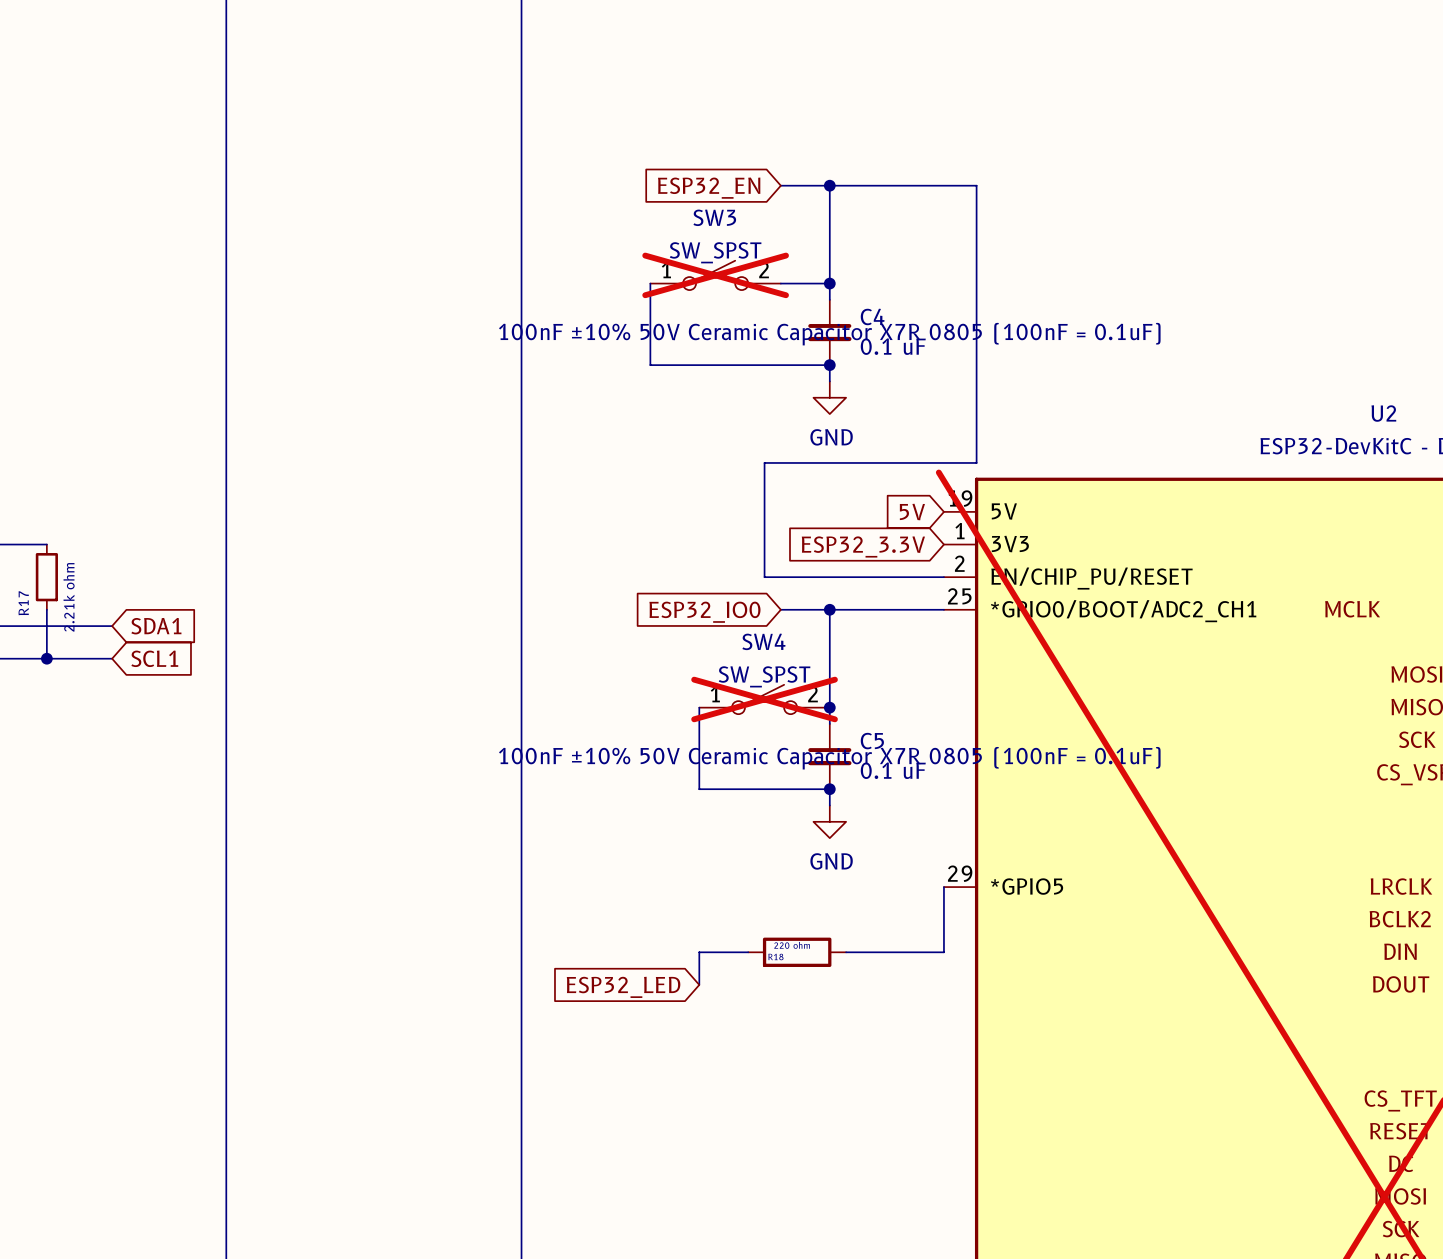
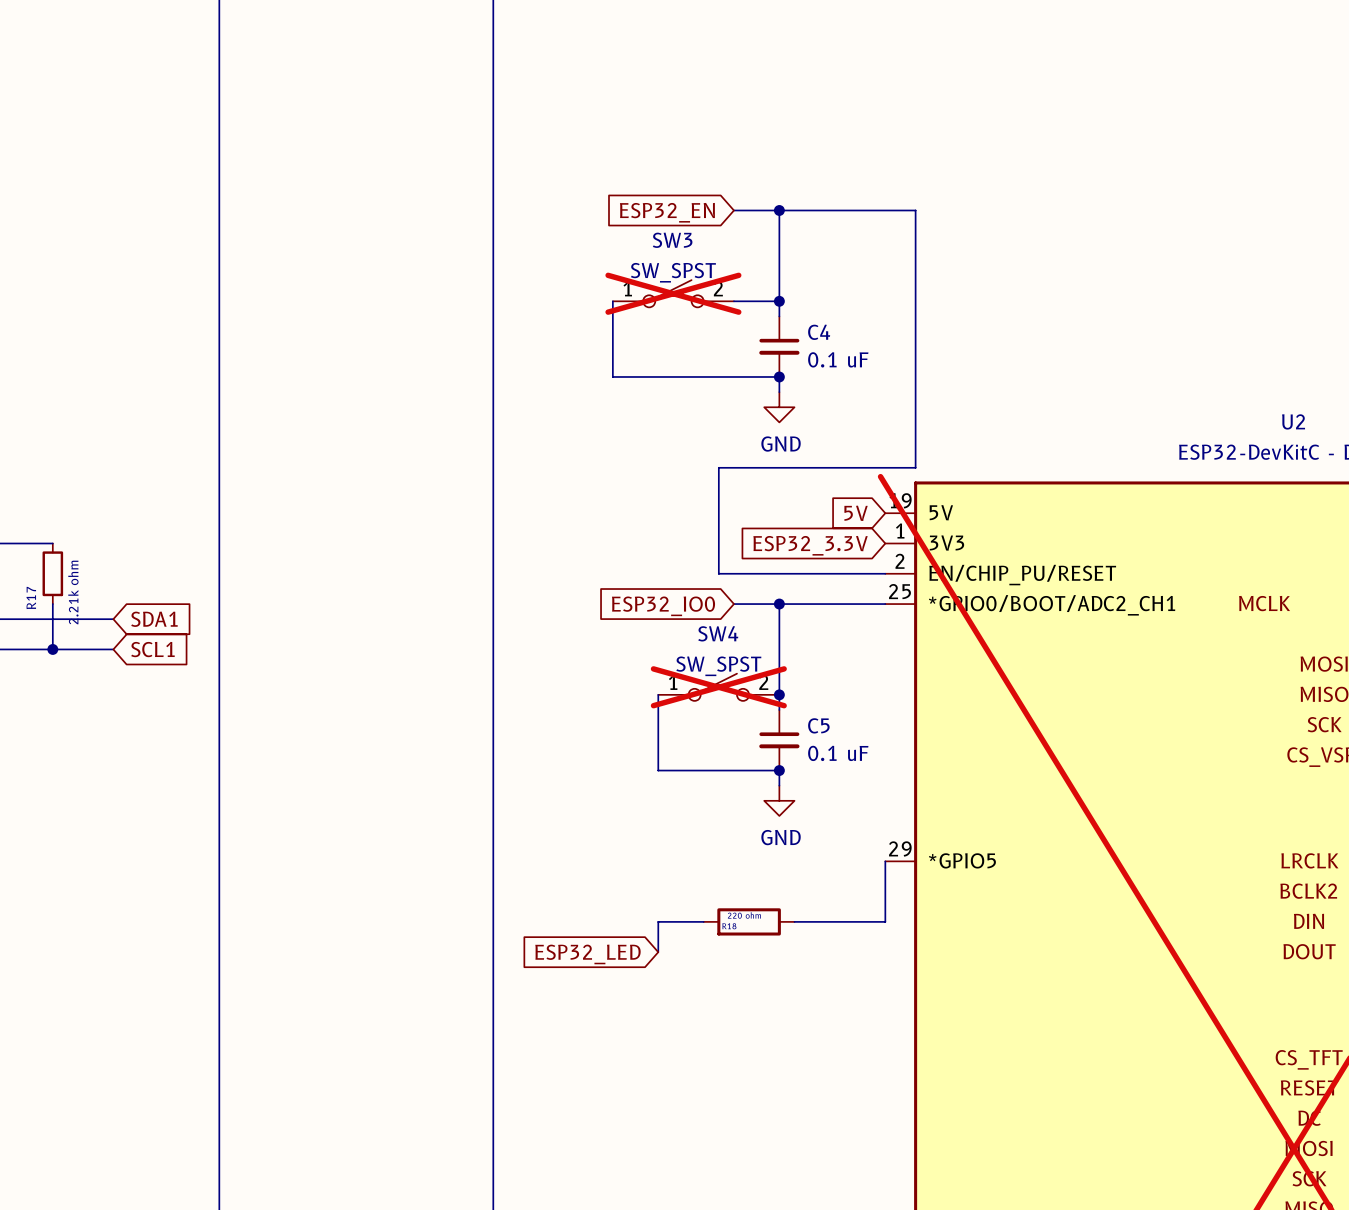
C4 text: 100nF ±10% 50V Ceramic Capacitor X7R 0805 (100nF = 0.1uF) (829, 334) -> none
C5 text: 100nF ±10% 50V Ceramic Capacitor X7R 0805 (100nF = 0.1uF) (829, 758) -> none

